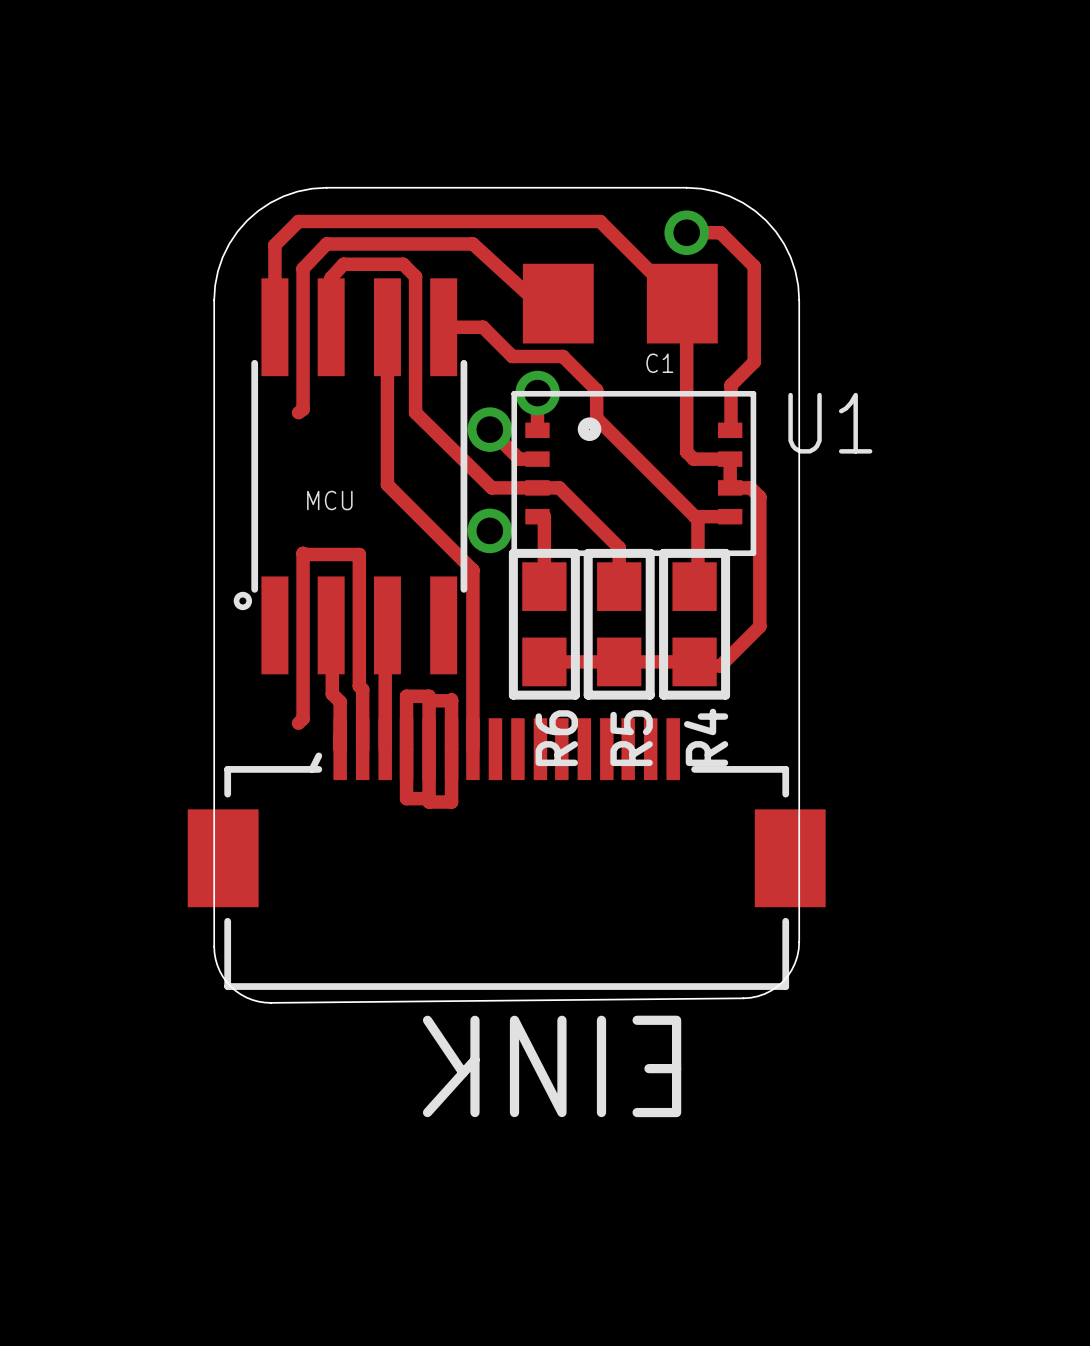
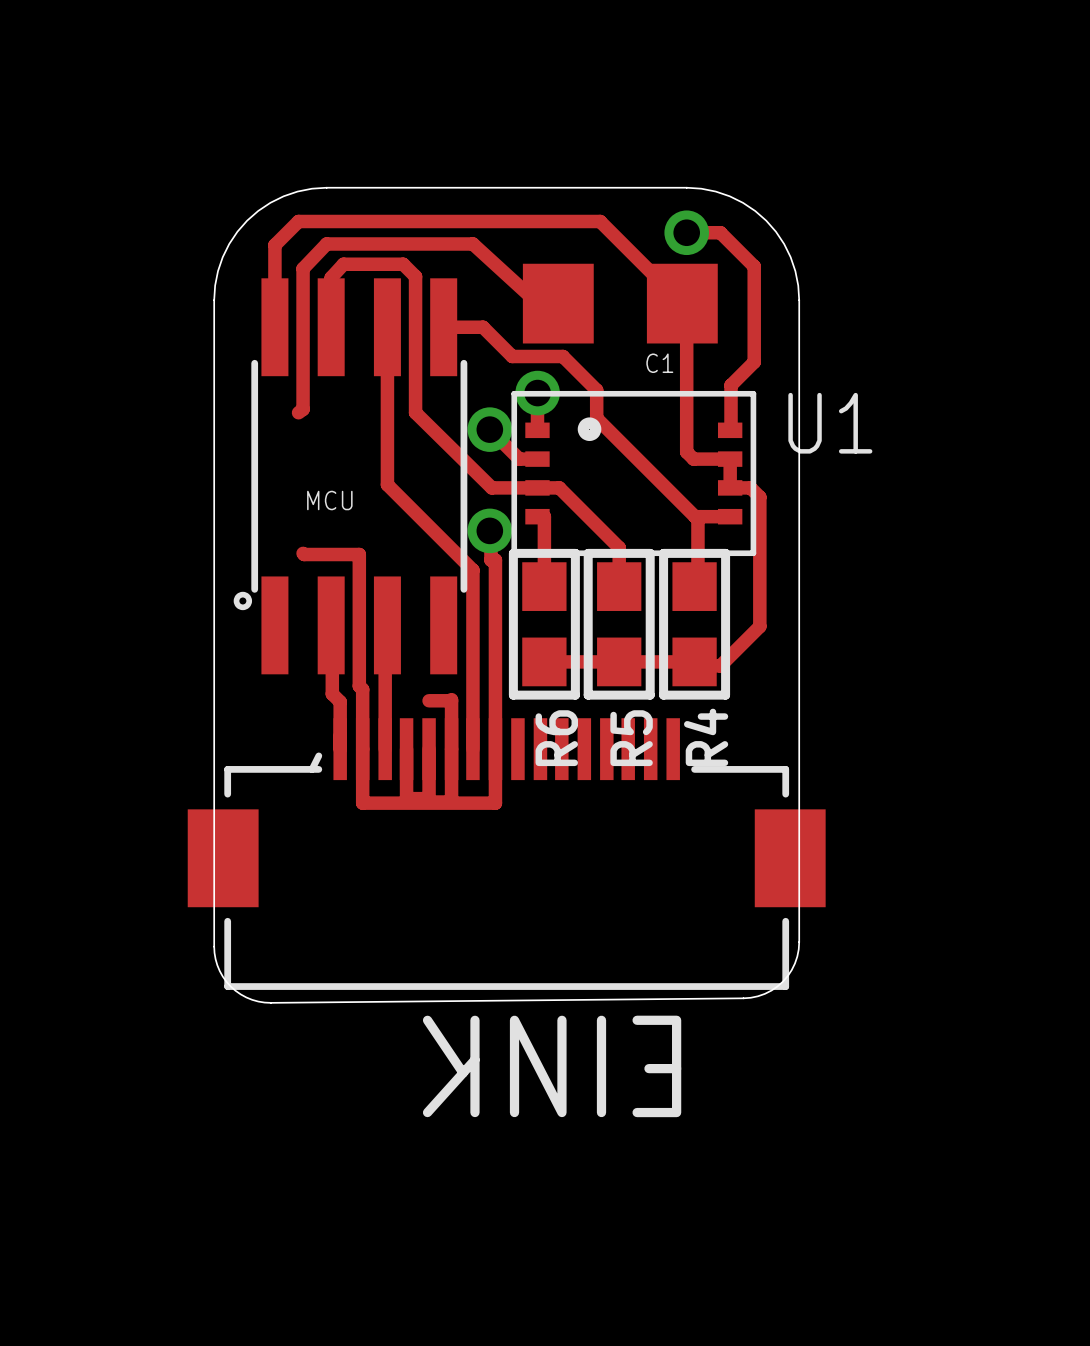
track: none -> (489, 530) (490, 560) (495, 560) (495, 803) (362, 803) (362, 749)
track: (303, 553) (303, 718) (298, 723) -> none
track: (406, 749) (406, 696) (429, 696) (429, 749) -> none

